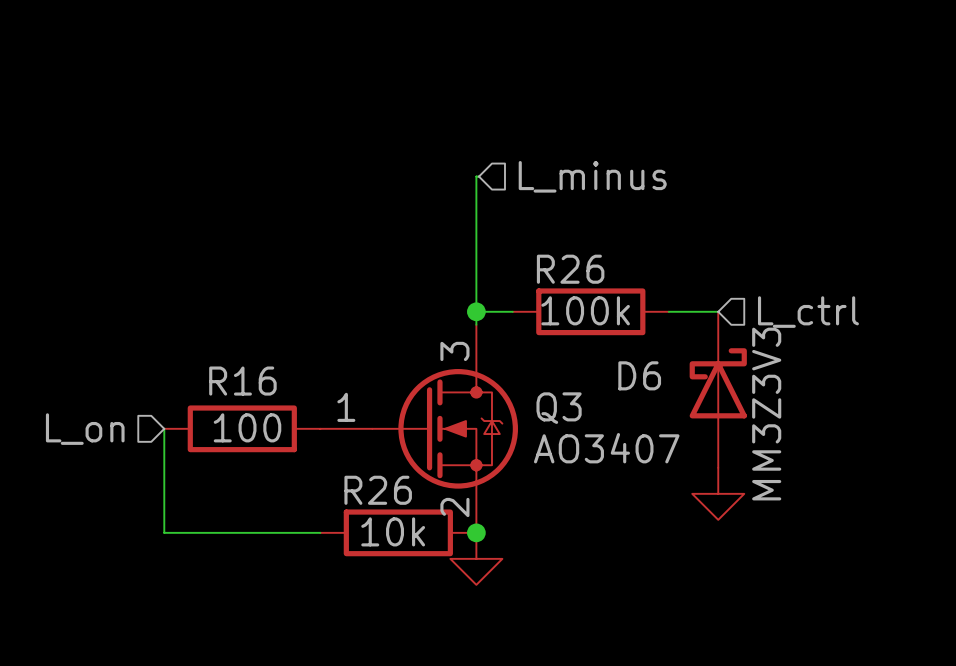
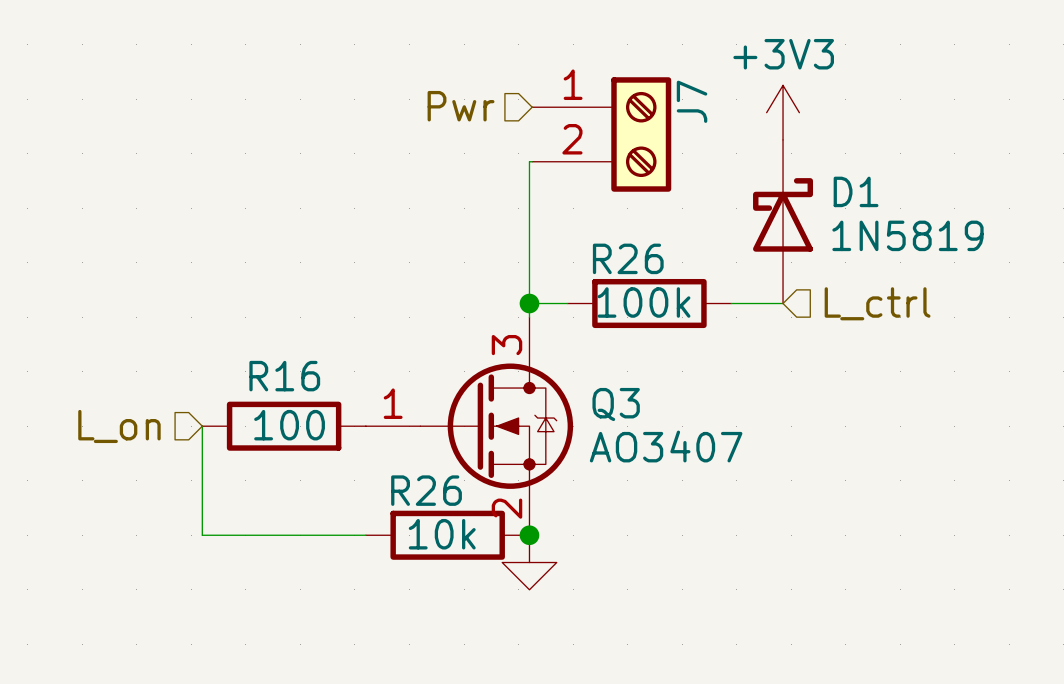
hierarchical label: none -> Pwr (461, 106)
power symbol: none -> +3V3 (783, 112)
J7: none -> (601, 134)
hierarchical label: L_minus (592, 176) -> none
D1: none -> 1N5819 (783, 221)
D6: MM3Z3V3 (718, 389) -> none
power symbol: (718, 493) -> none

